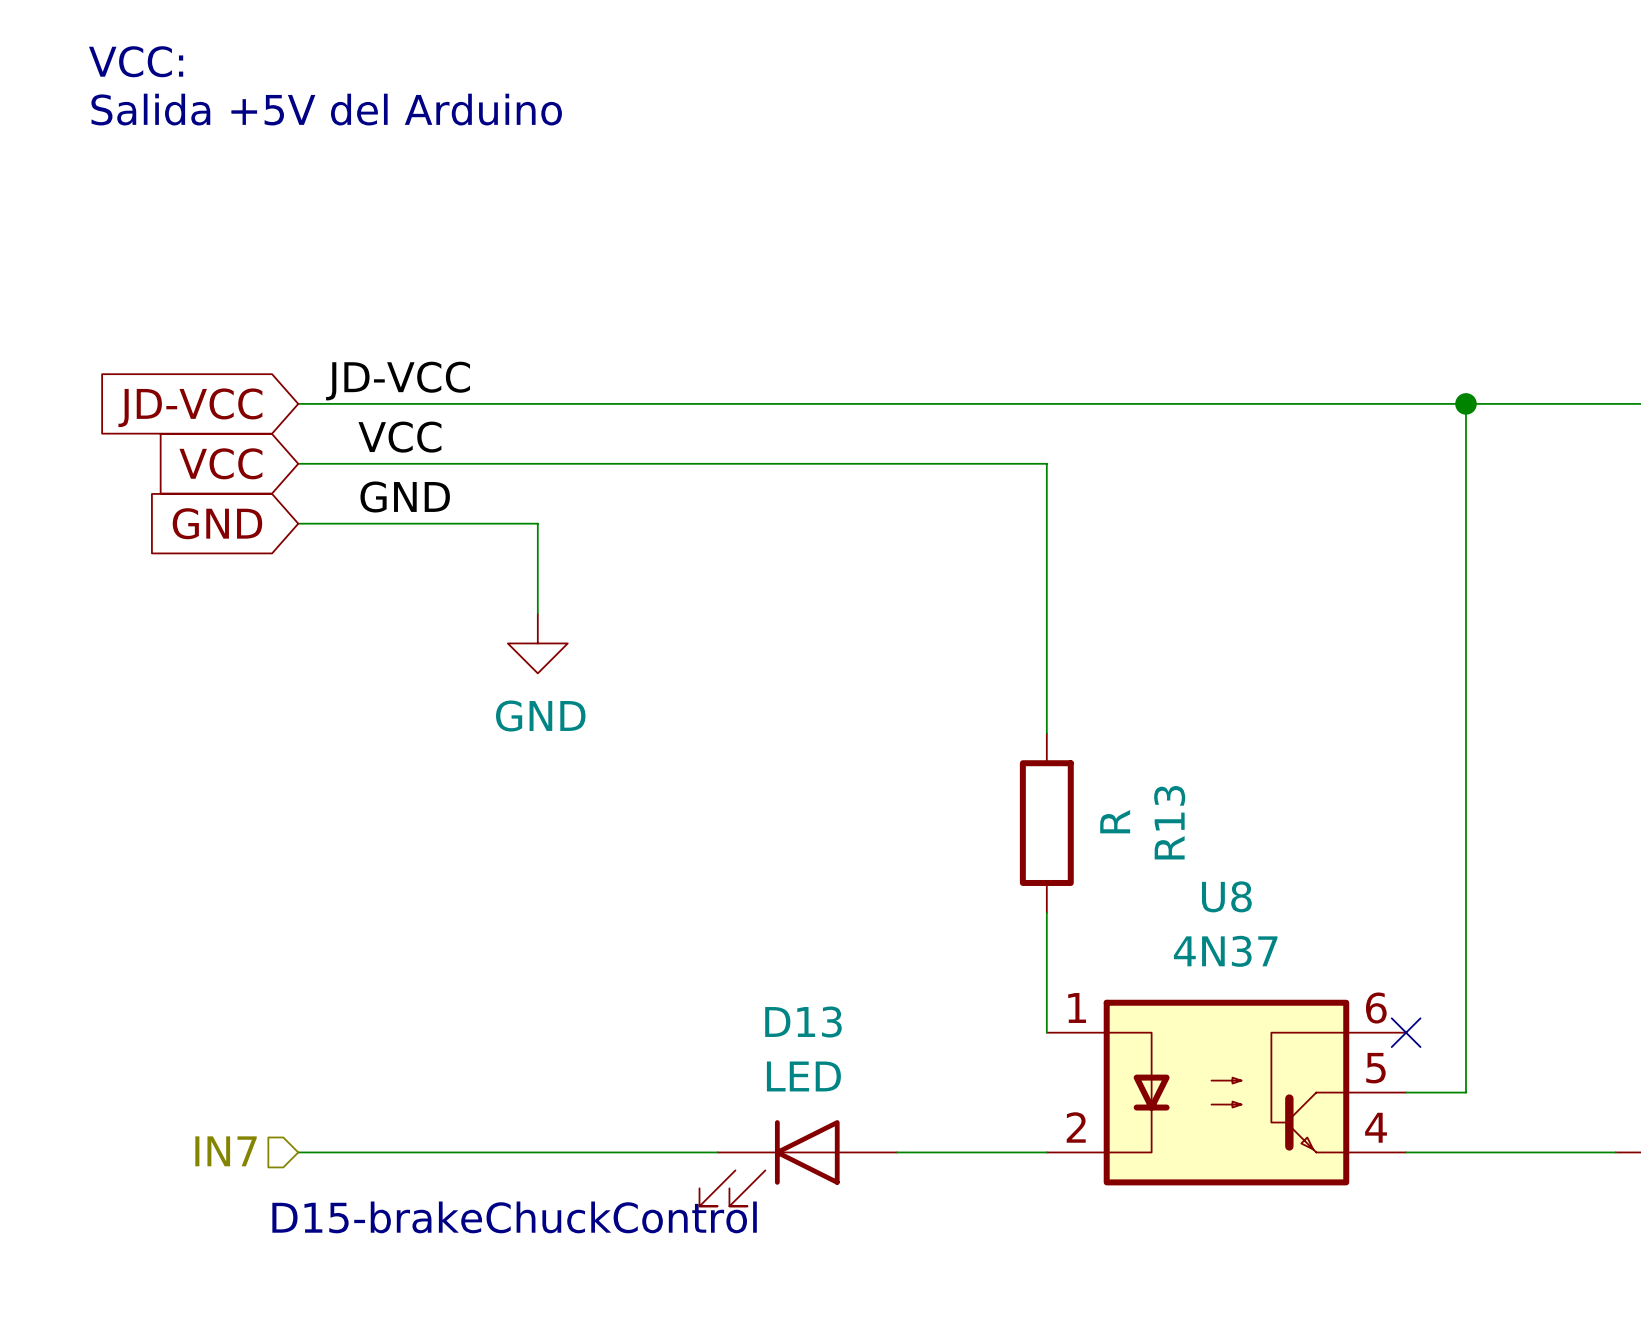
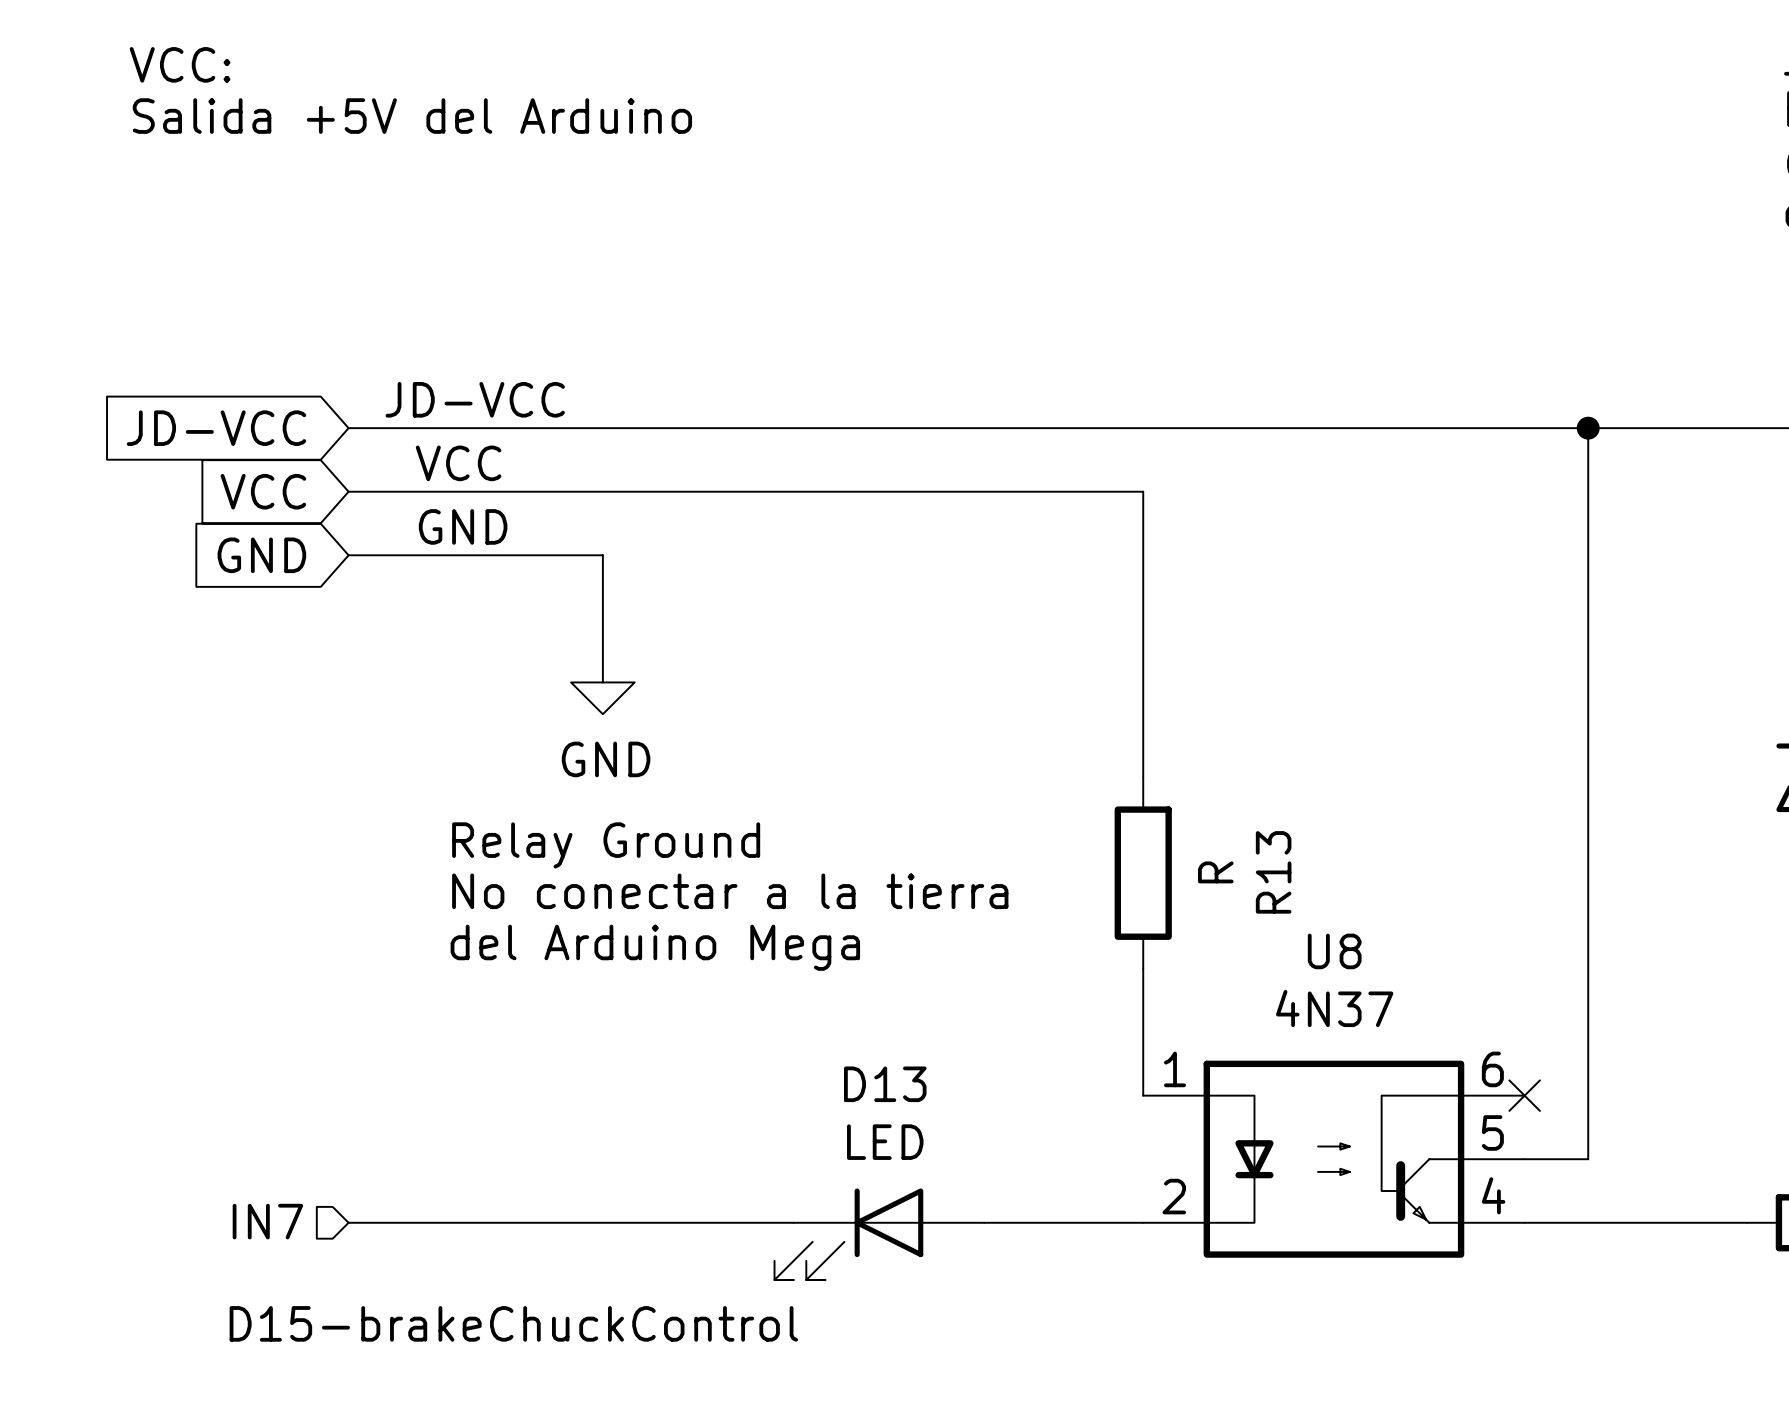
text: none -> Relay Ground (606, 845)
text: none -> No conectar a la tierra (730, 891)
text: none -> del Arduino Mega (655, 947)
text position: D15-brakeChuckControl (514, 1217) -> D15-brakeChuckControl (513, 1323)

